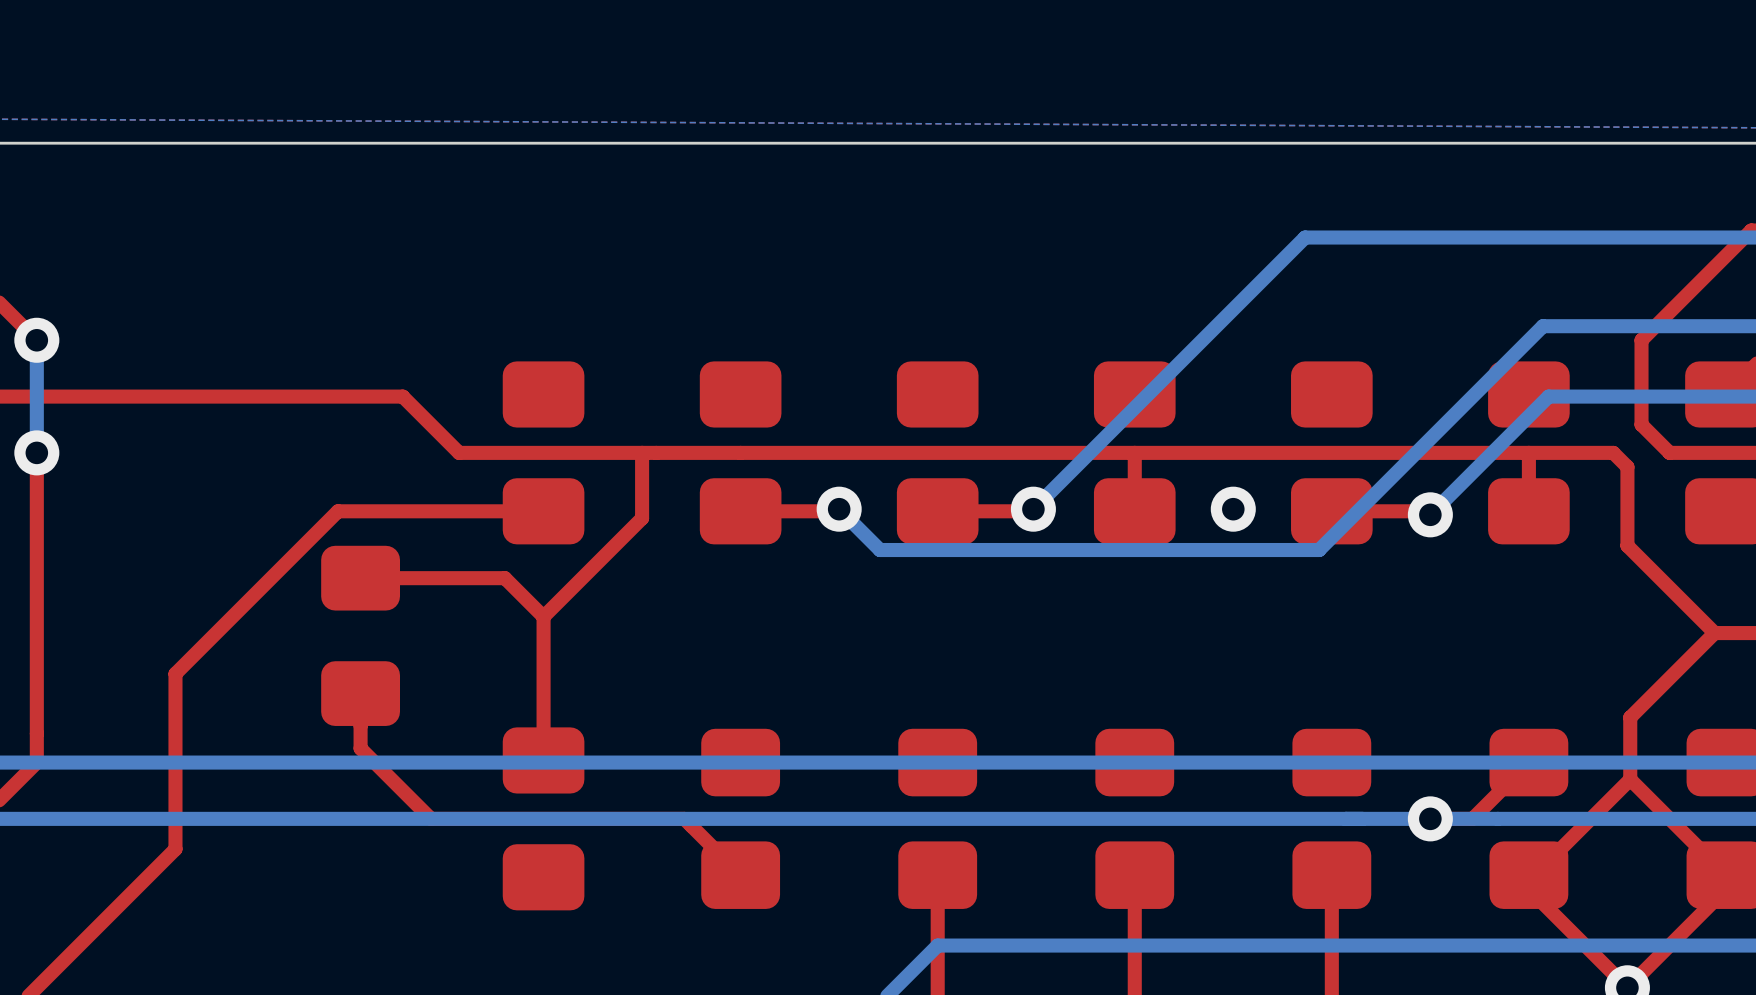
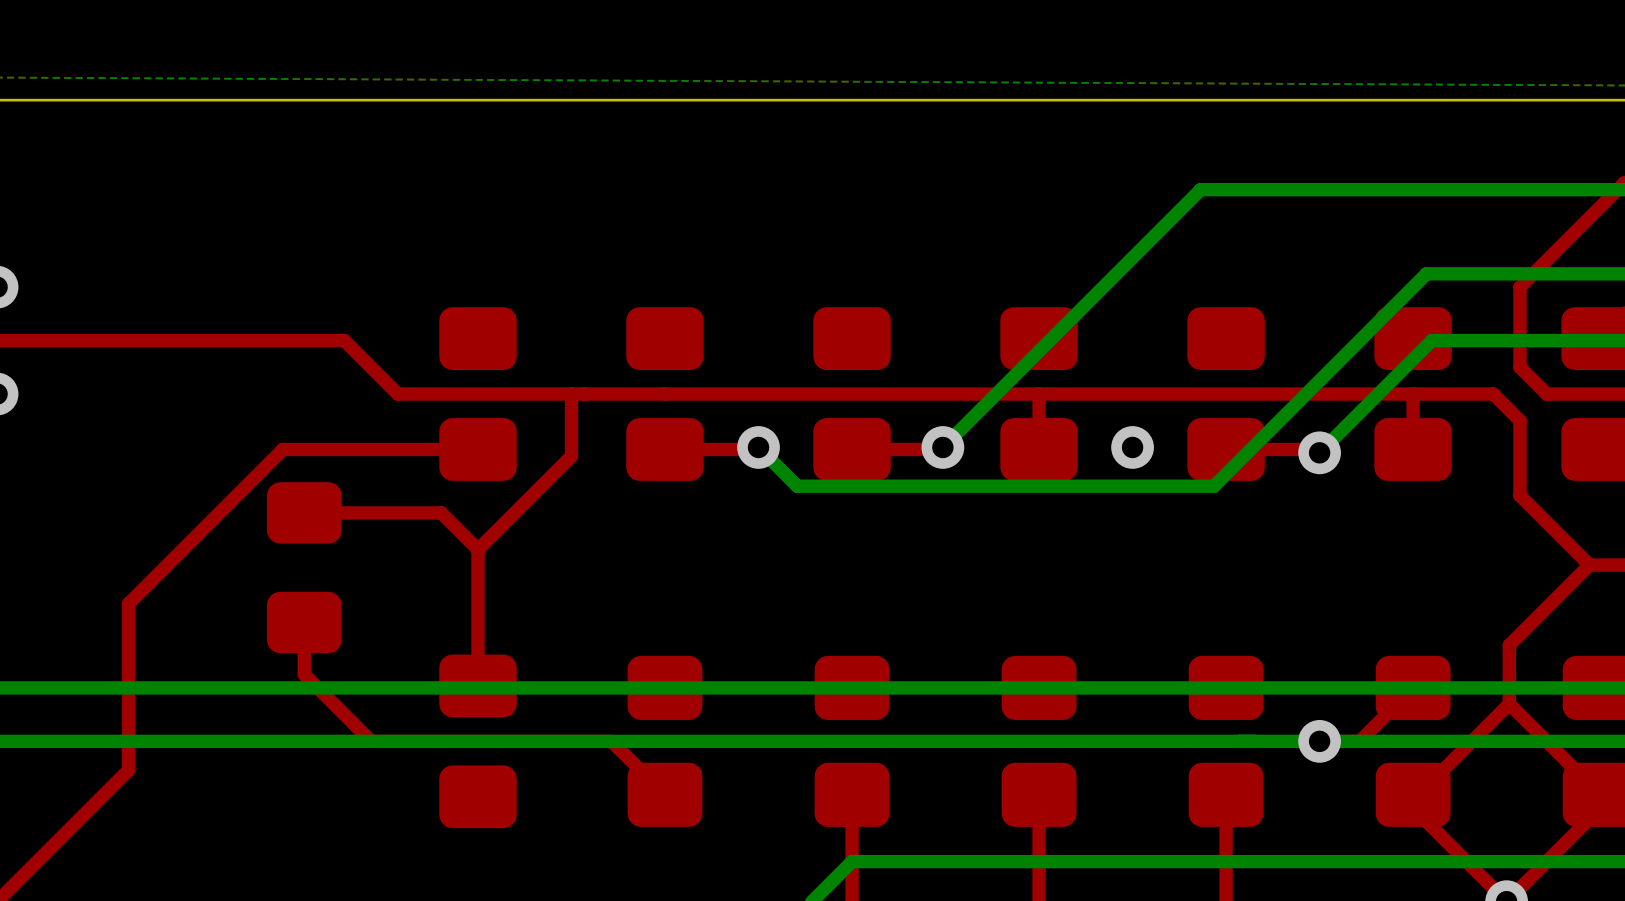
top track: (1627, 466) (1627, 545) (1641, 559) -> (1506, 407) (1519, 420) (1519, 495)

